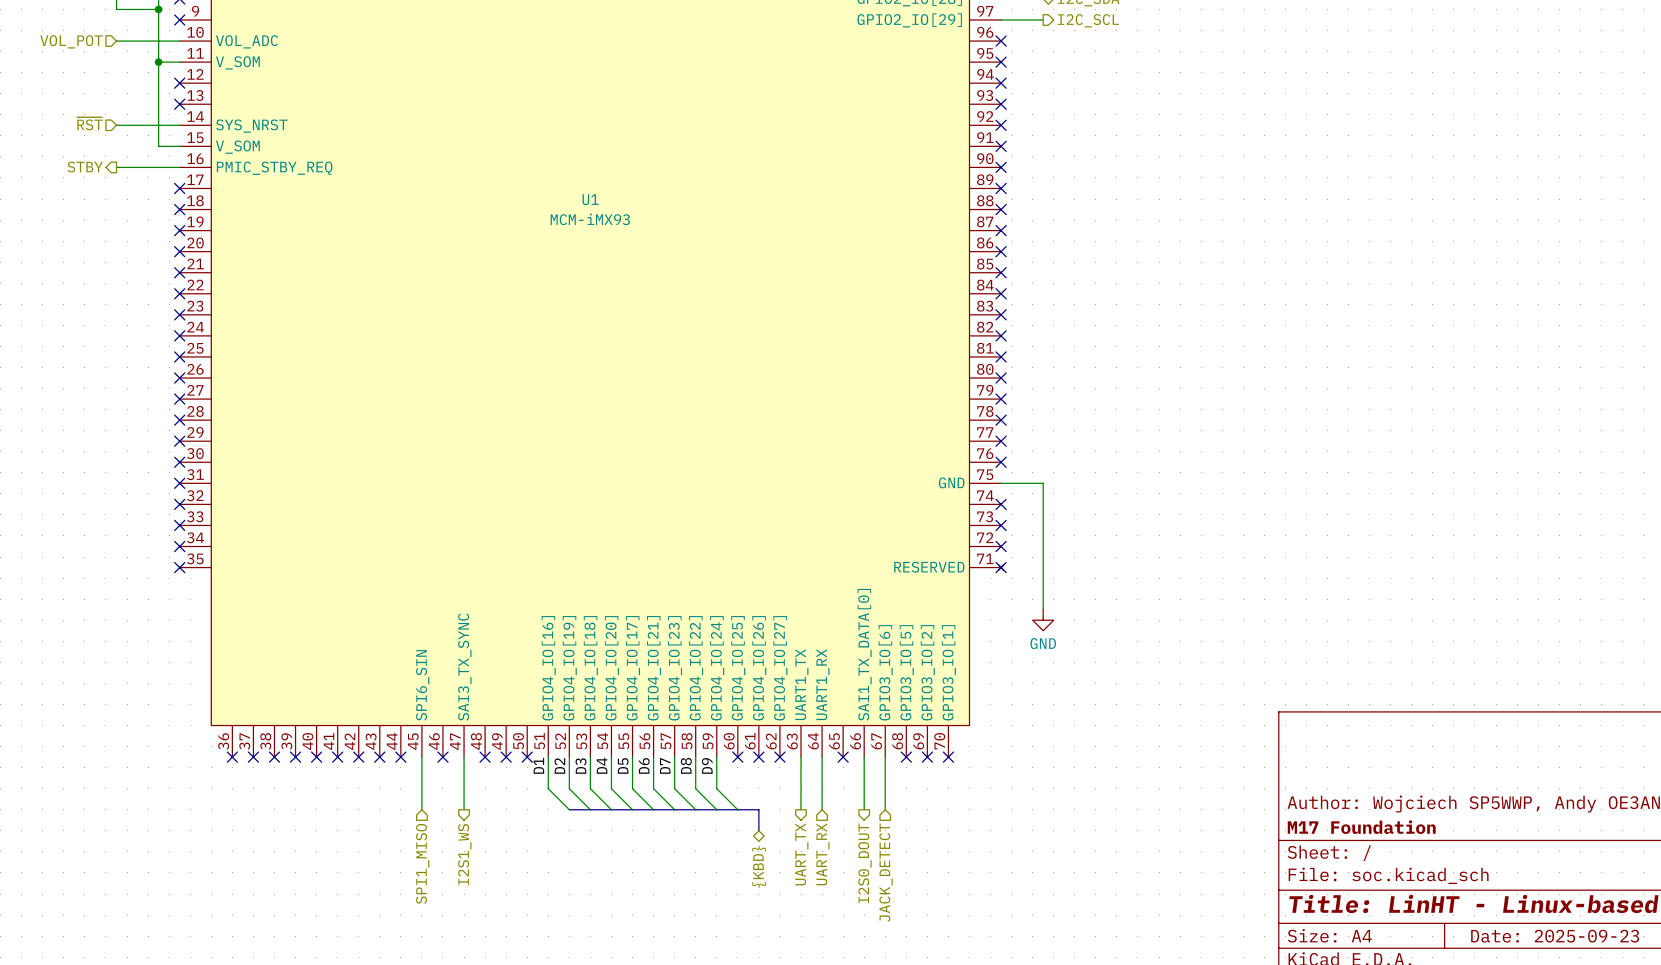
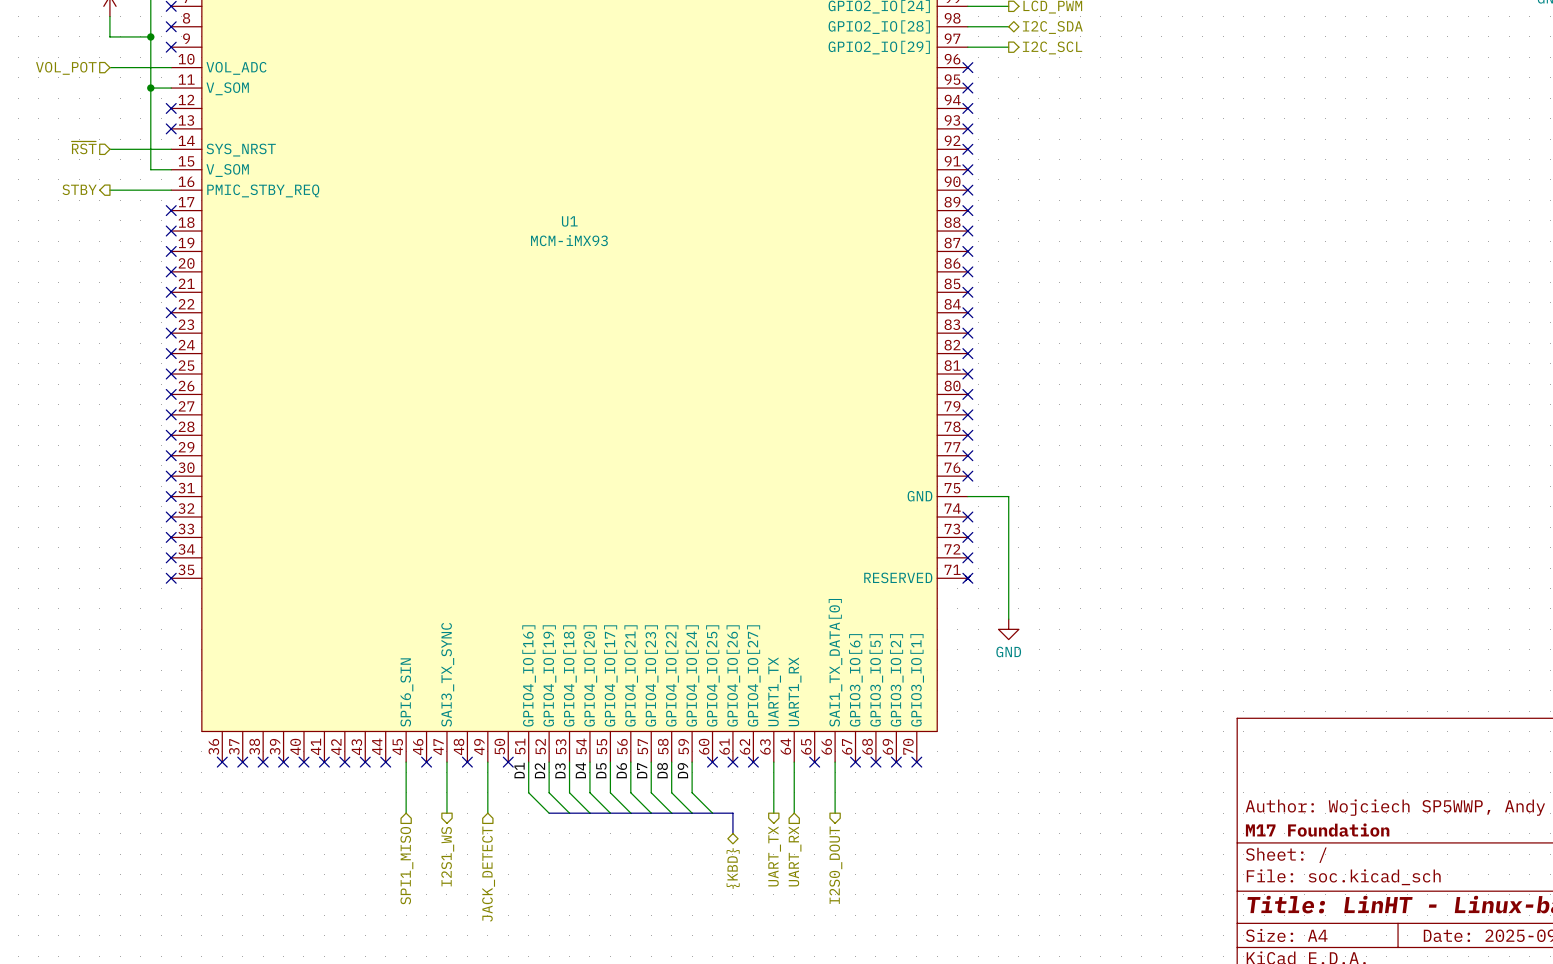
wire: none -> (487, 762) (487, 813)
no-connect mark: (506, 757) -> none
wire: (885, 757) (885, 809) -> none
no-connect mark: none -> (855, 762)
hierarchical label: none -> JACK_DETECT (488, 874)
hierarchical label: JACK_DETECT (886, 872) -> none

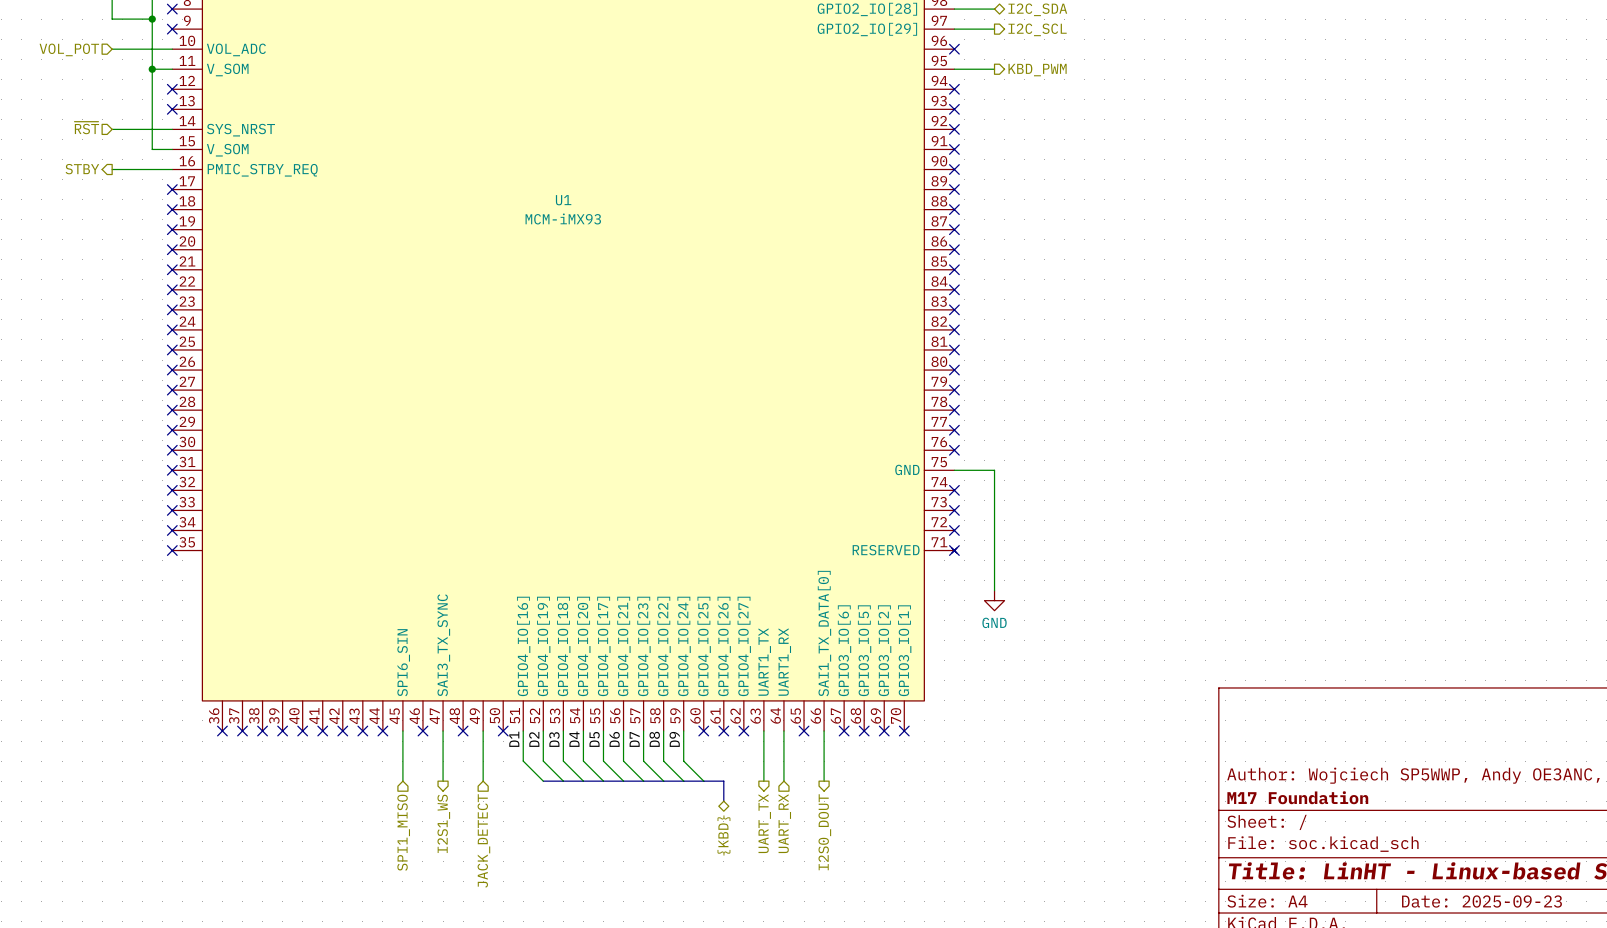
wire: none -> (954, 69) (994, 69)
no-connect mark: (967, 88) -> none
hierarchical label: none -> KBD_PWM (1037, 70)

